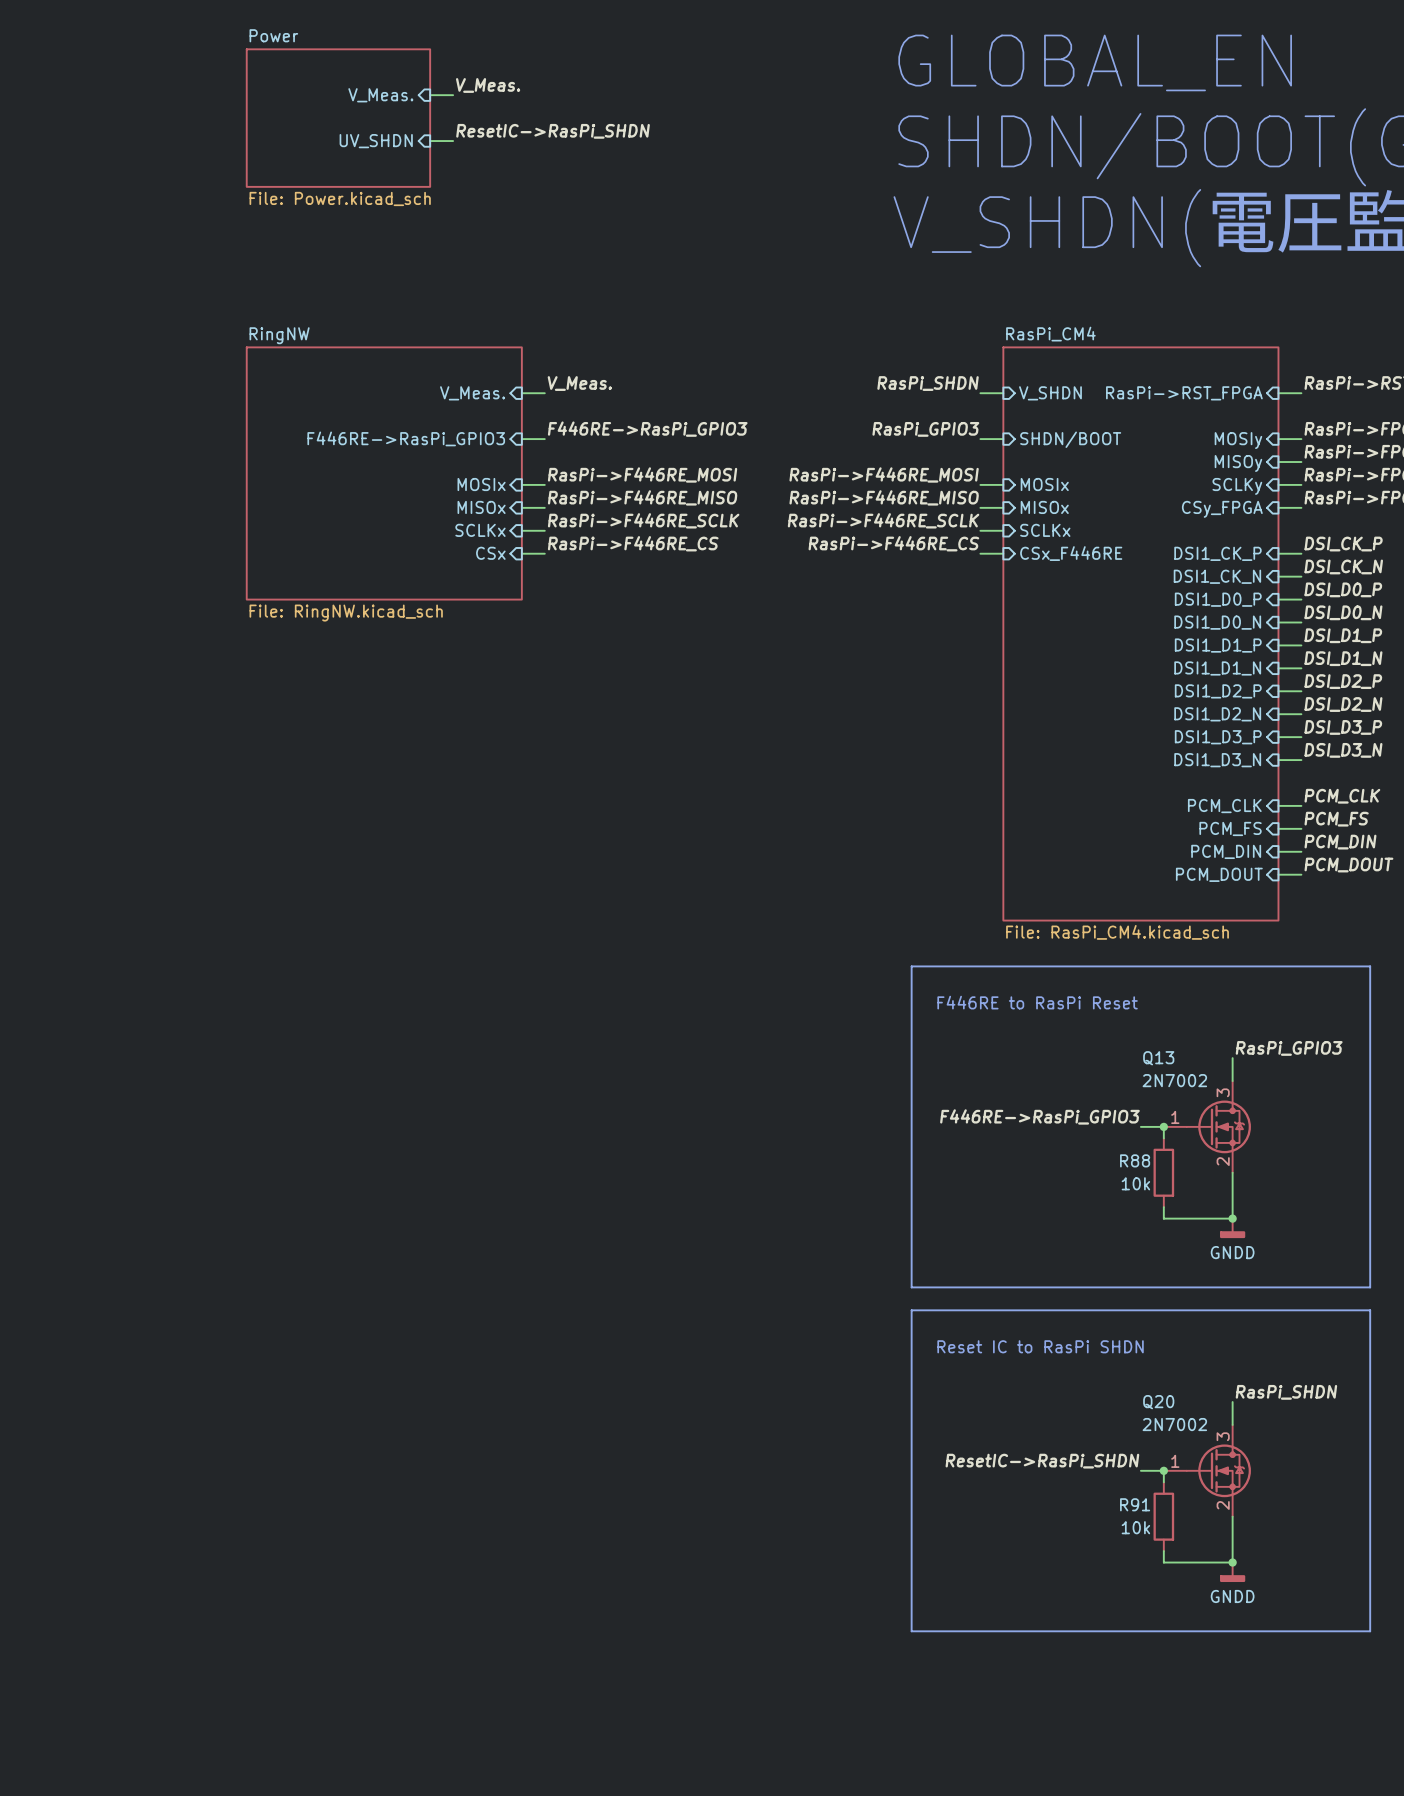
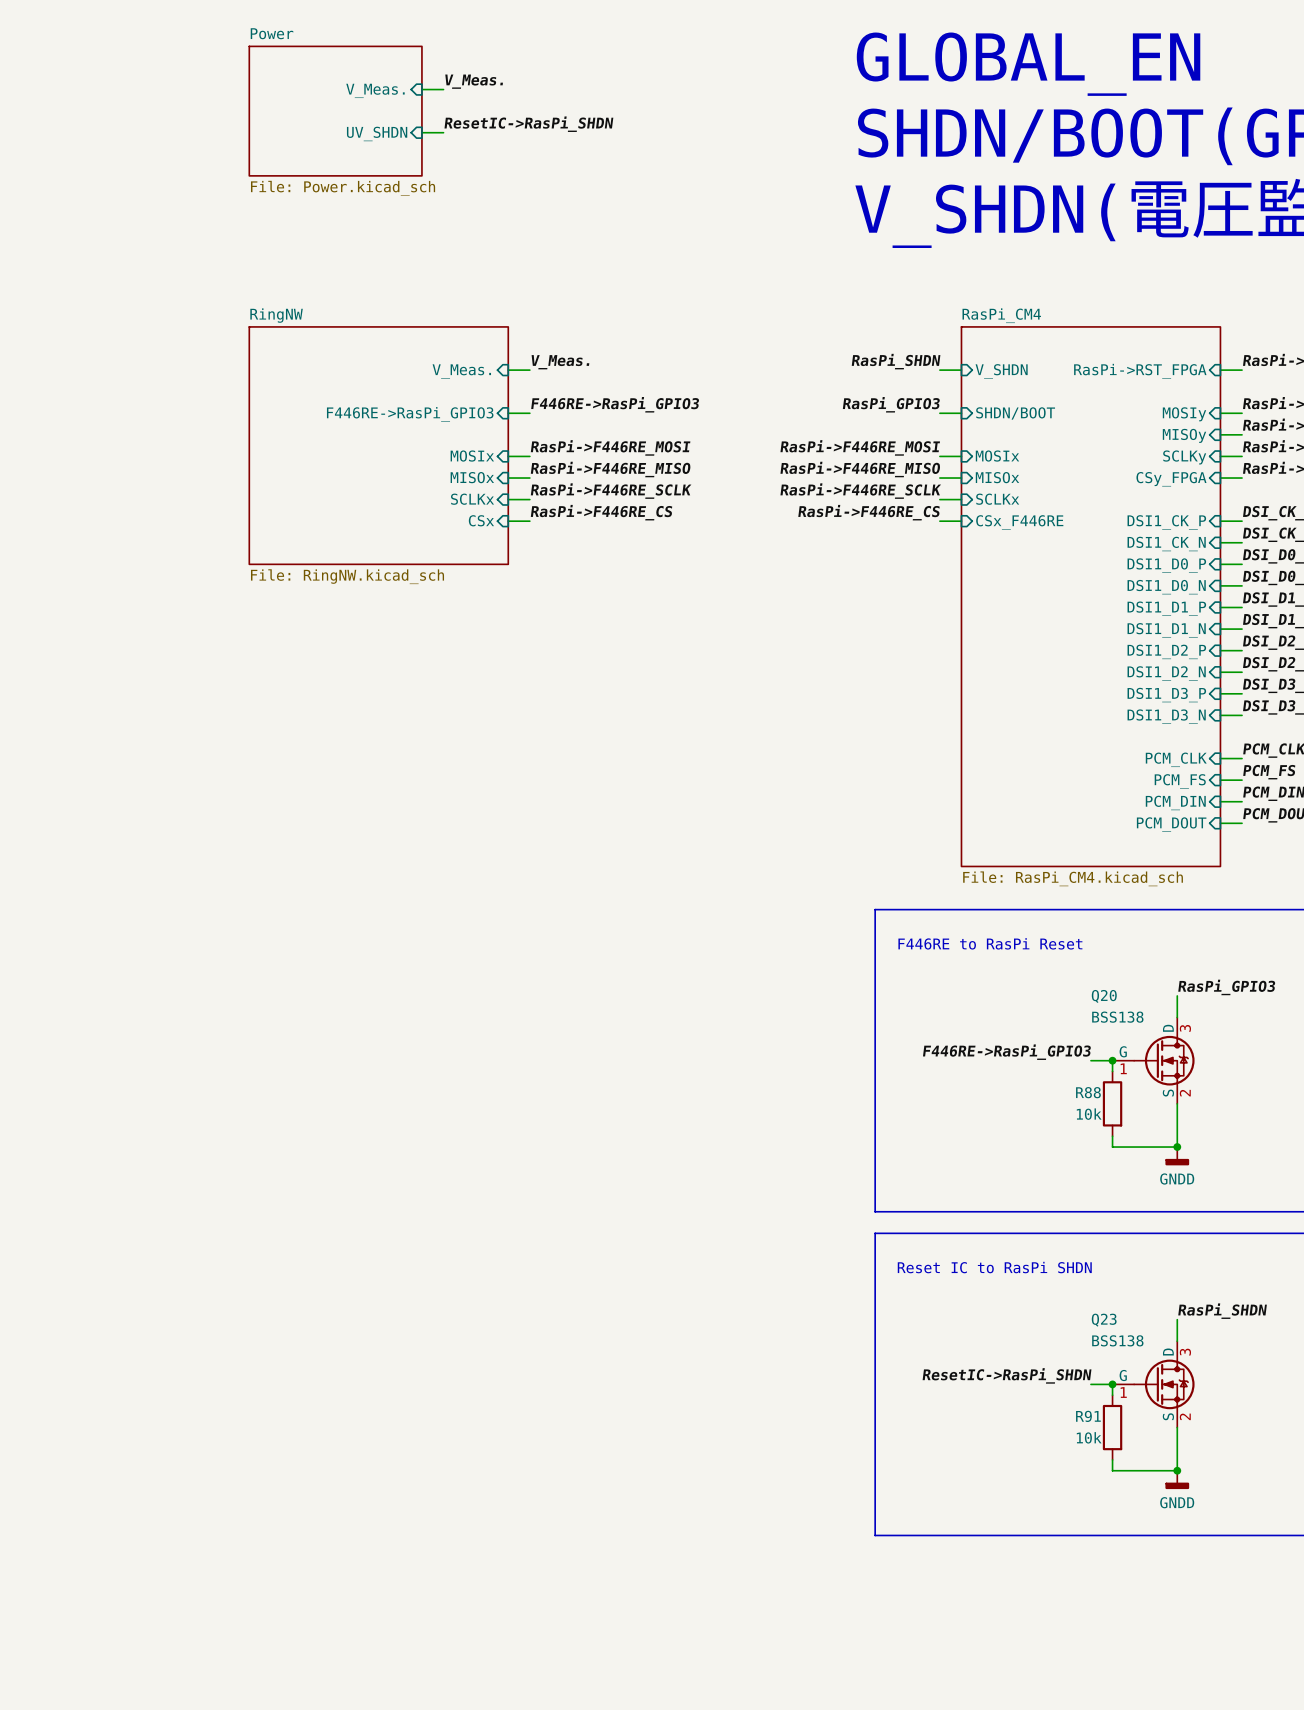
Q20 pin name: none -> D (1168, 1028)
Q20 pin name: none -> G (1123, 1051)
Q13: 2N7002 (1207, 1126) -> none
Q20 pin name: none -> S (1168, 1093)
Q20 value: 2N7002 (1174, 1424) -> BSS138 (1117, 1017)
Q20 position: (1207, 1470) -> (1153, 1060)
Q23: none -> BSS138 (1153, 1384)

